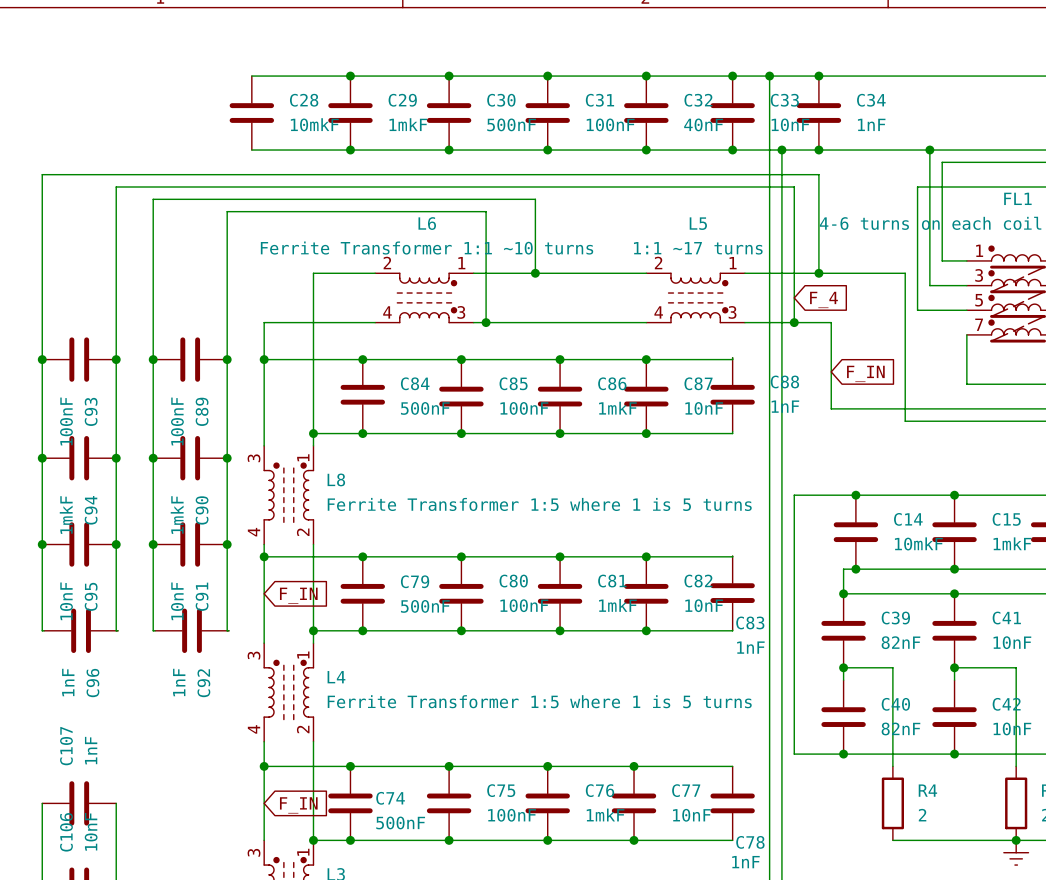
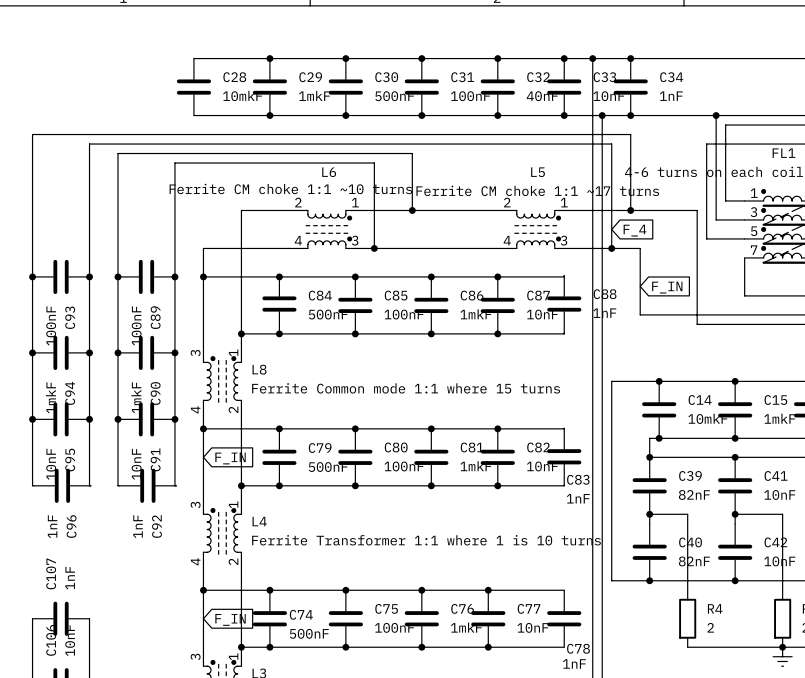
L6 value: Ferrite Transformer 1:1 ~10 turns (427, 248) -> Ferrite CM choke 1:1 ~10 turns (290, 188)
L5 value: 1:1 ~17 turns (698, 248) -> Ferrite CM choke 1:1 ~17 turns (537, 190)
L8 value: Ferrite Transformer 1:5 where 1 is 5 turns (539, 504) -> Ferrite Common mode 1:1 where 15 turns (406, 388)
L4 value: Ferrite Transformer 1:5 where 1 is 5 turns (539, 701) -> Ferrite Transformer 1:1 where 1 is 10 turns (426, 540)

